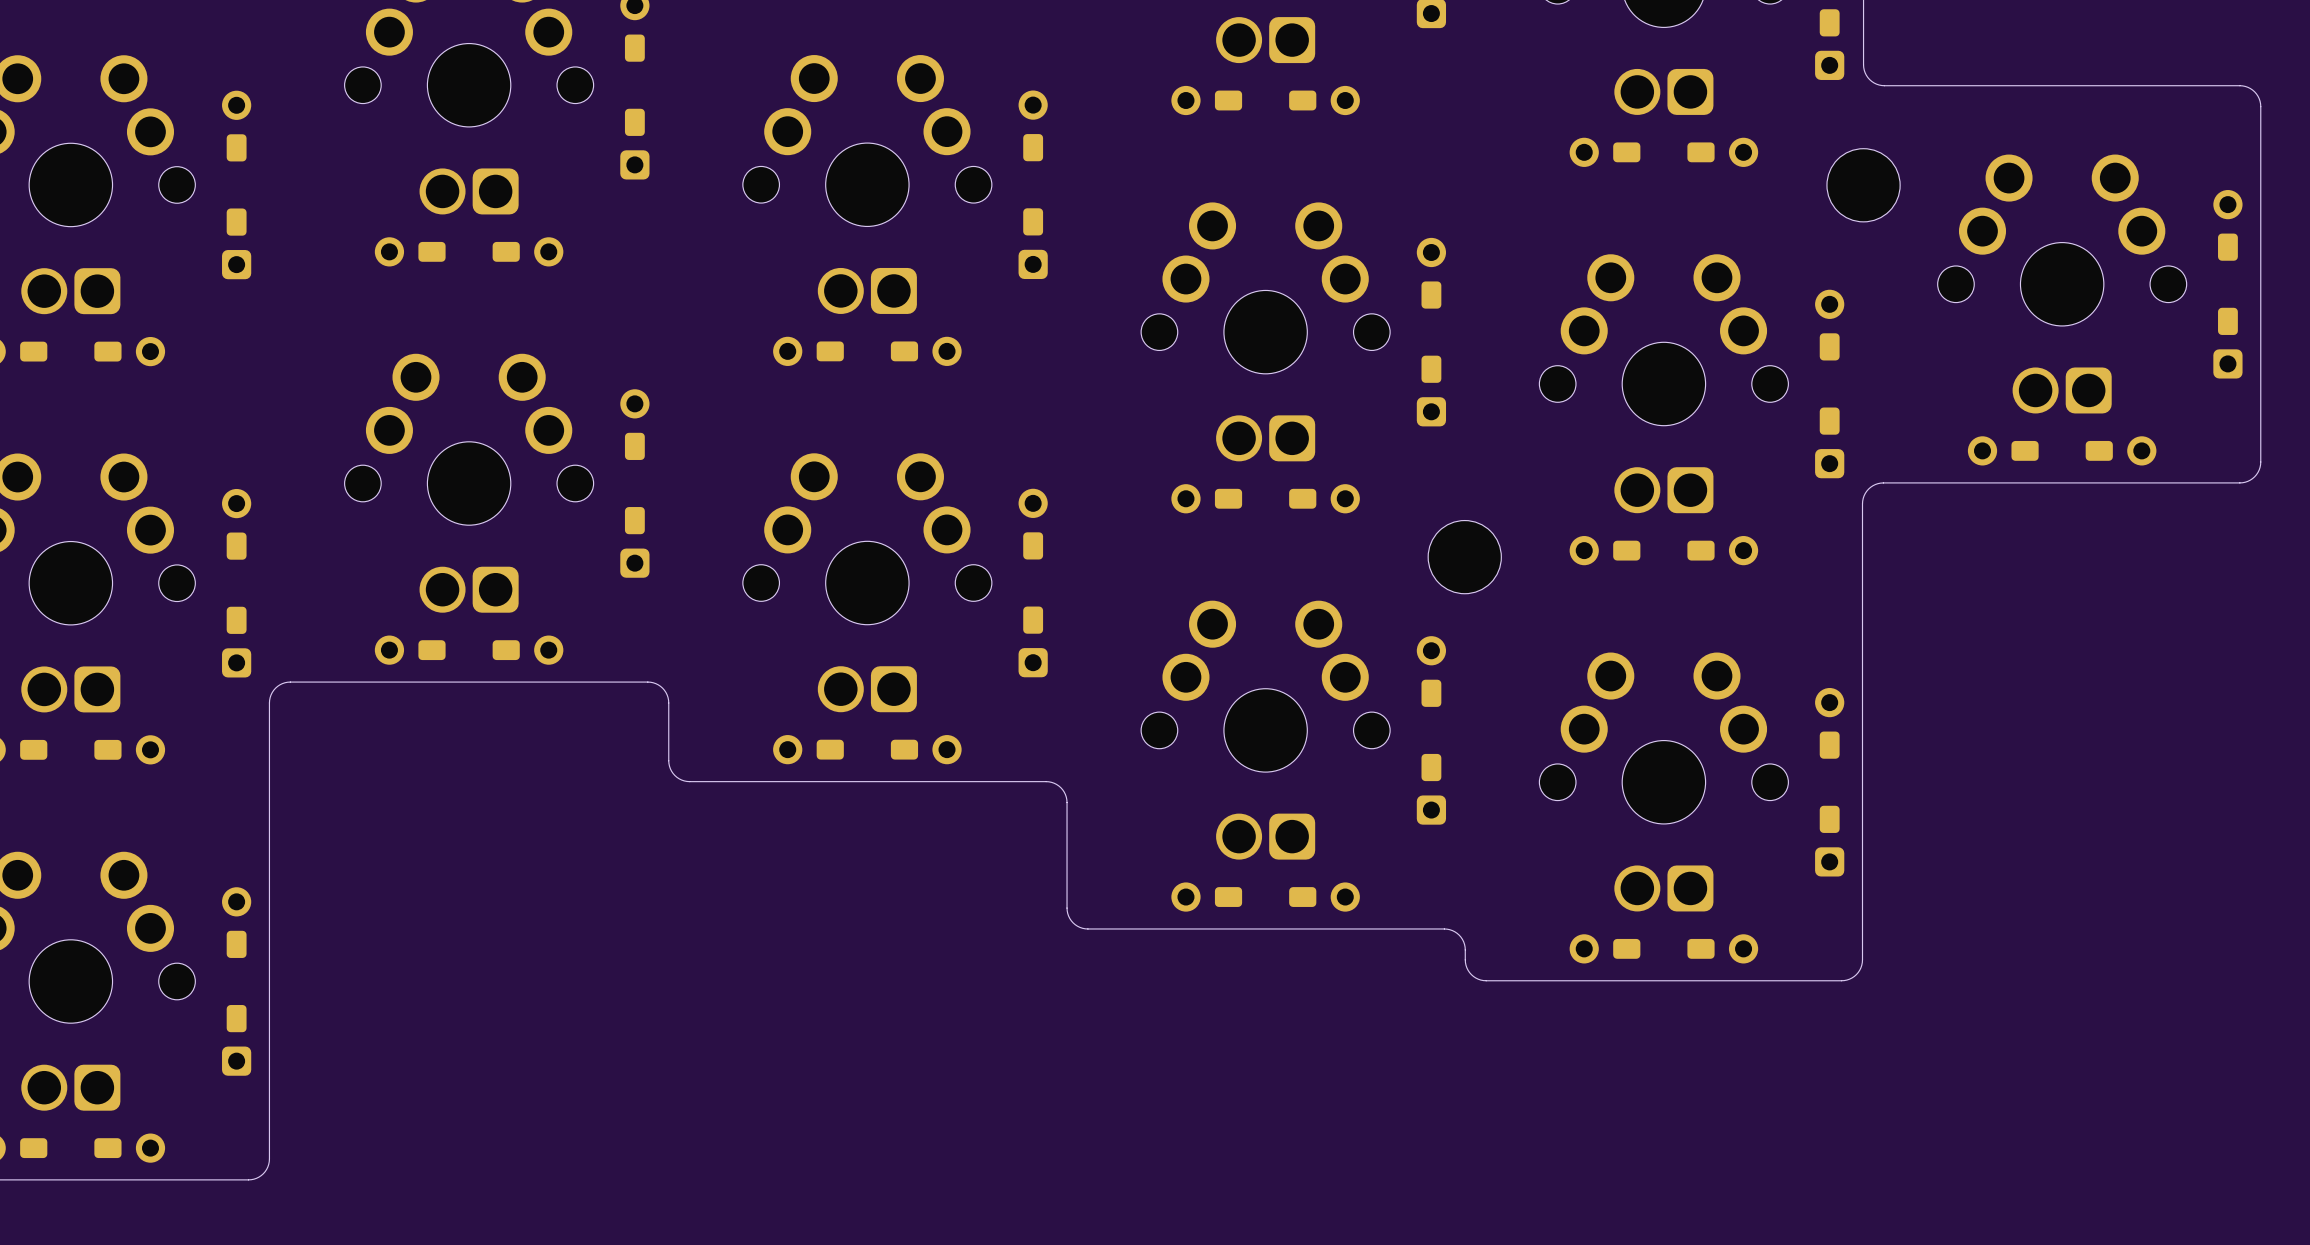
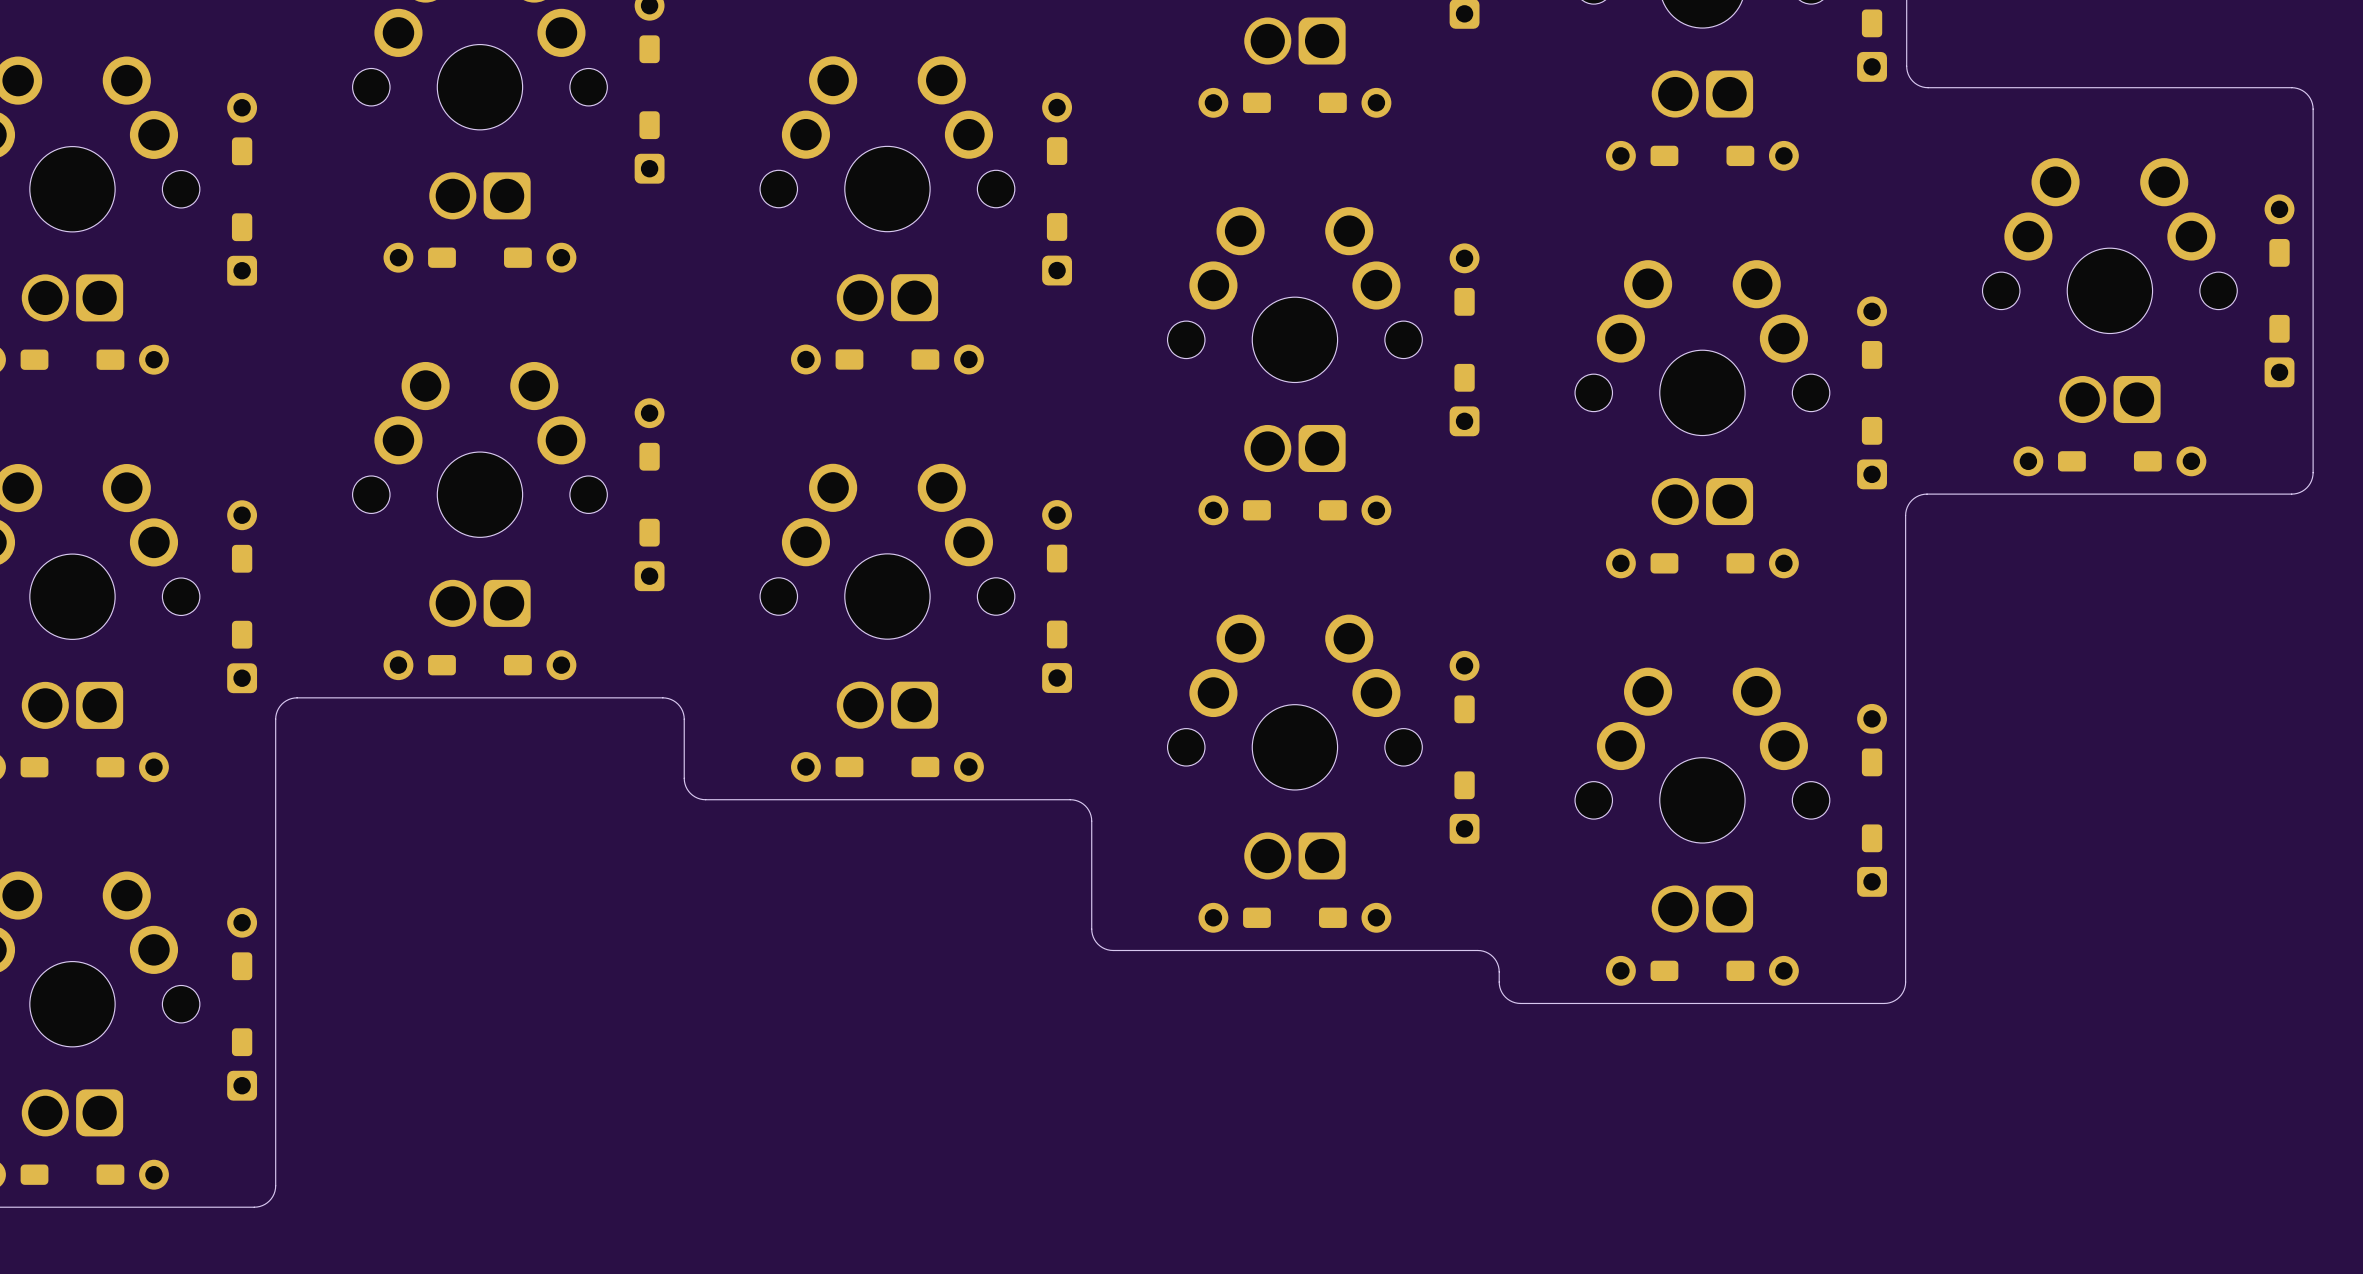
part: (1863, 185) -> none
part: (1464, 557) -> none

